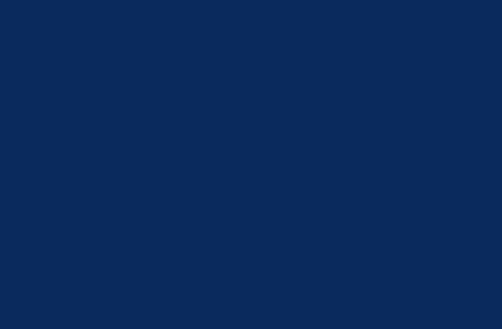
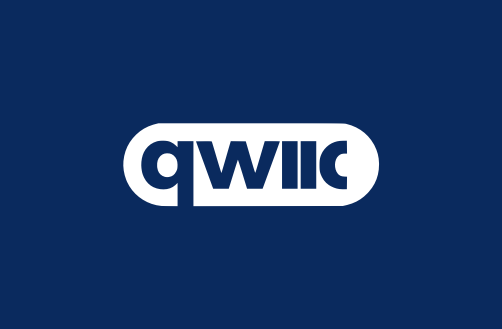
drawing: none -> [123, 123, 380, 207]

